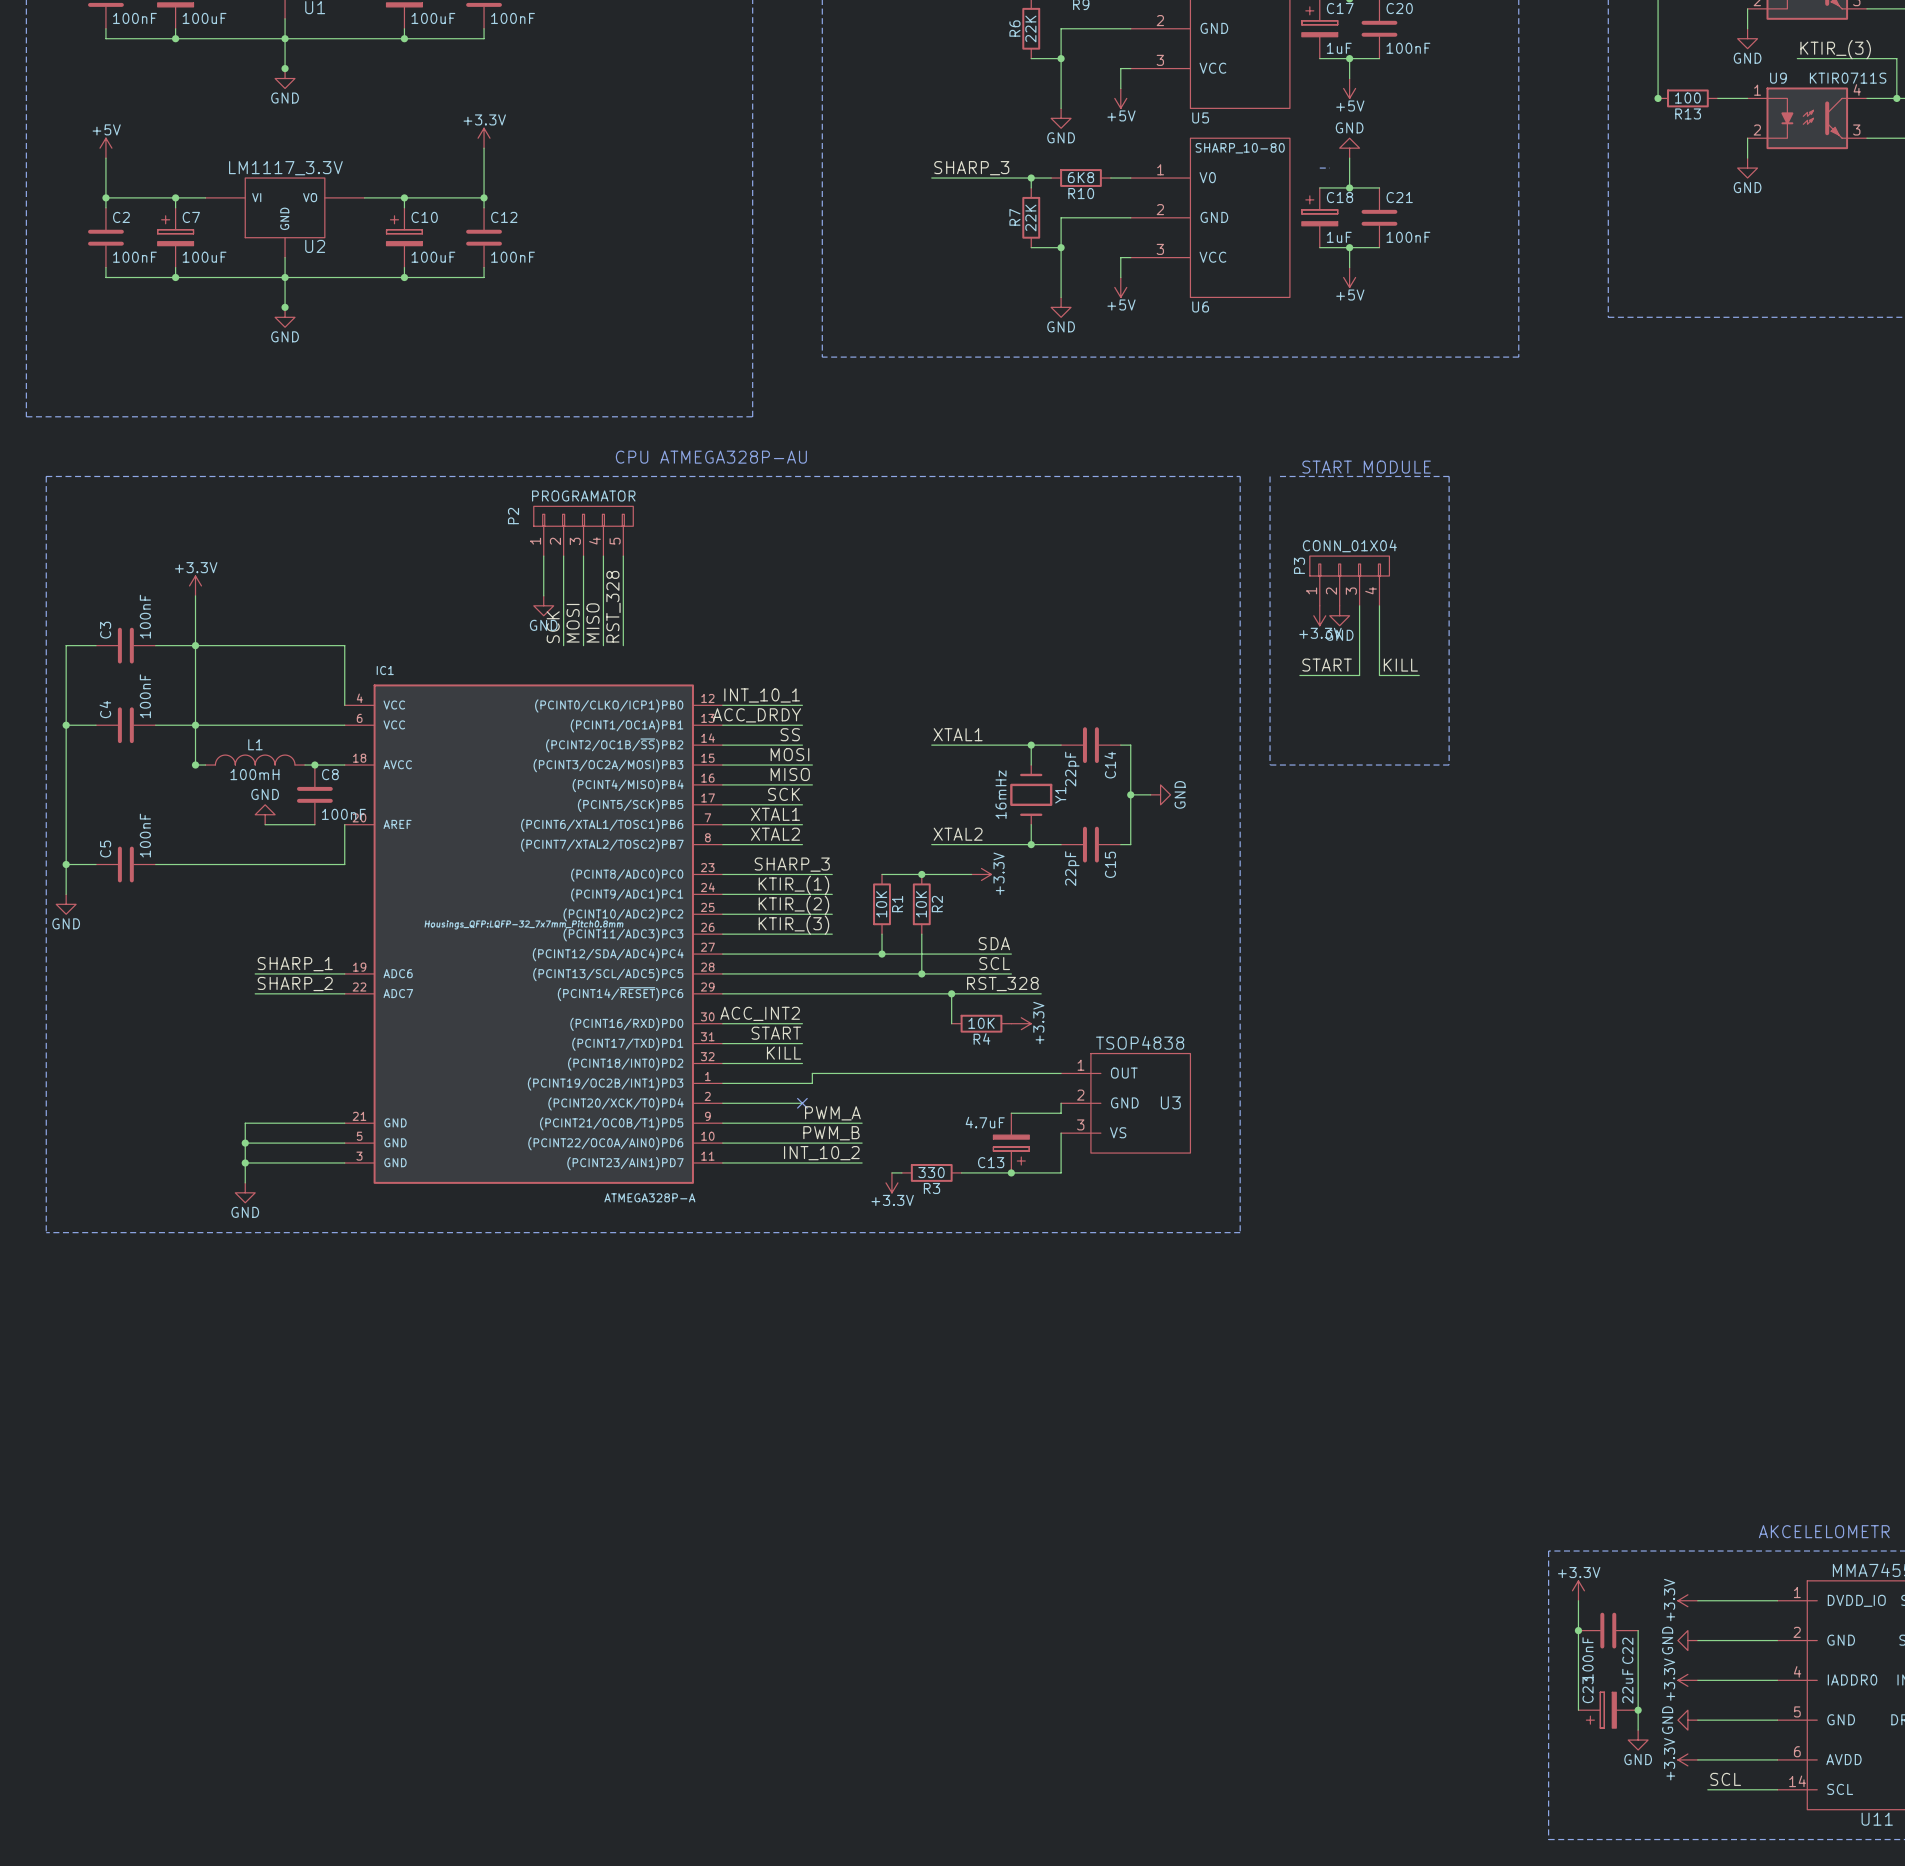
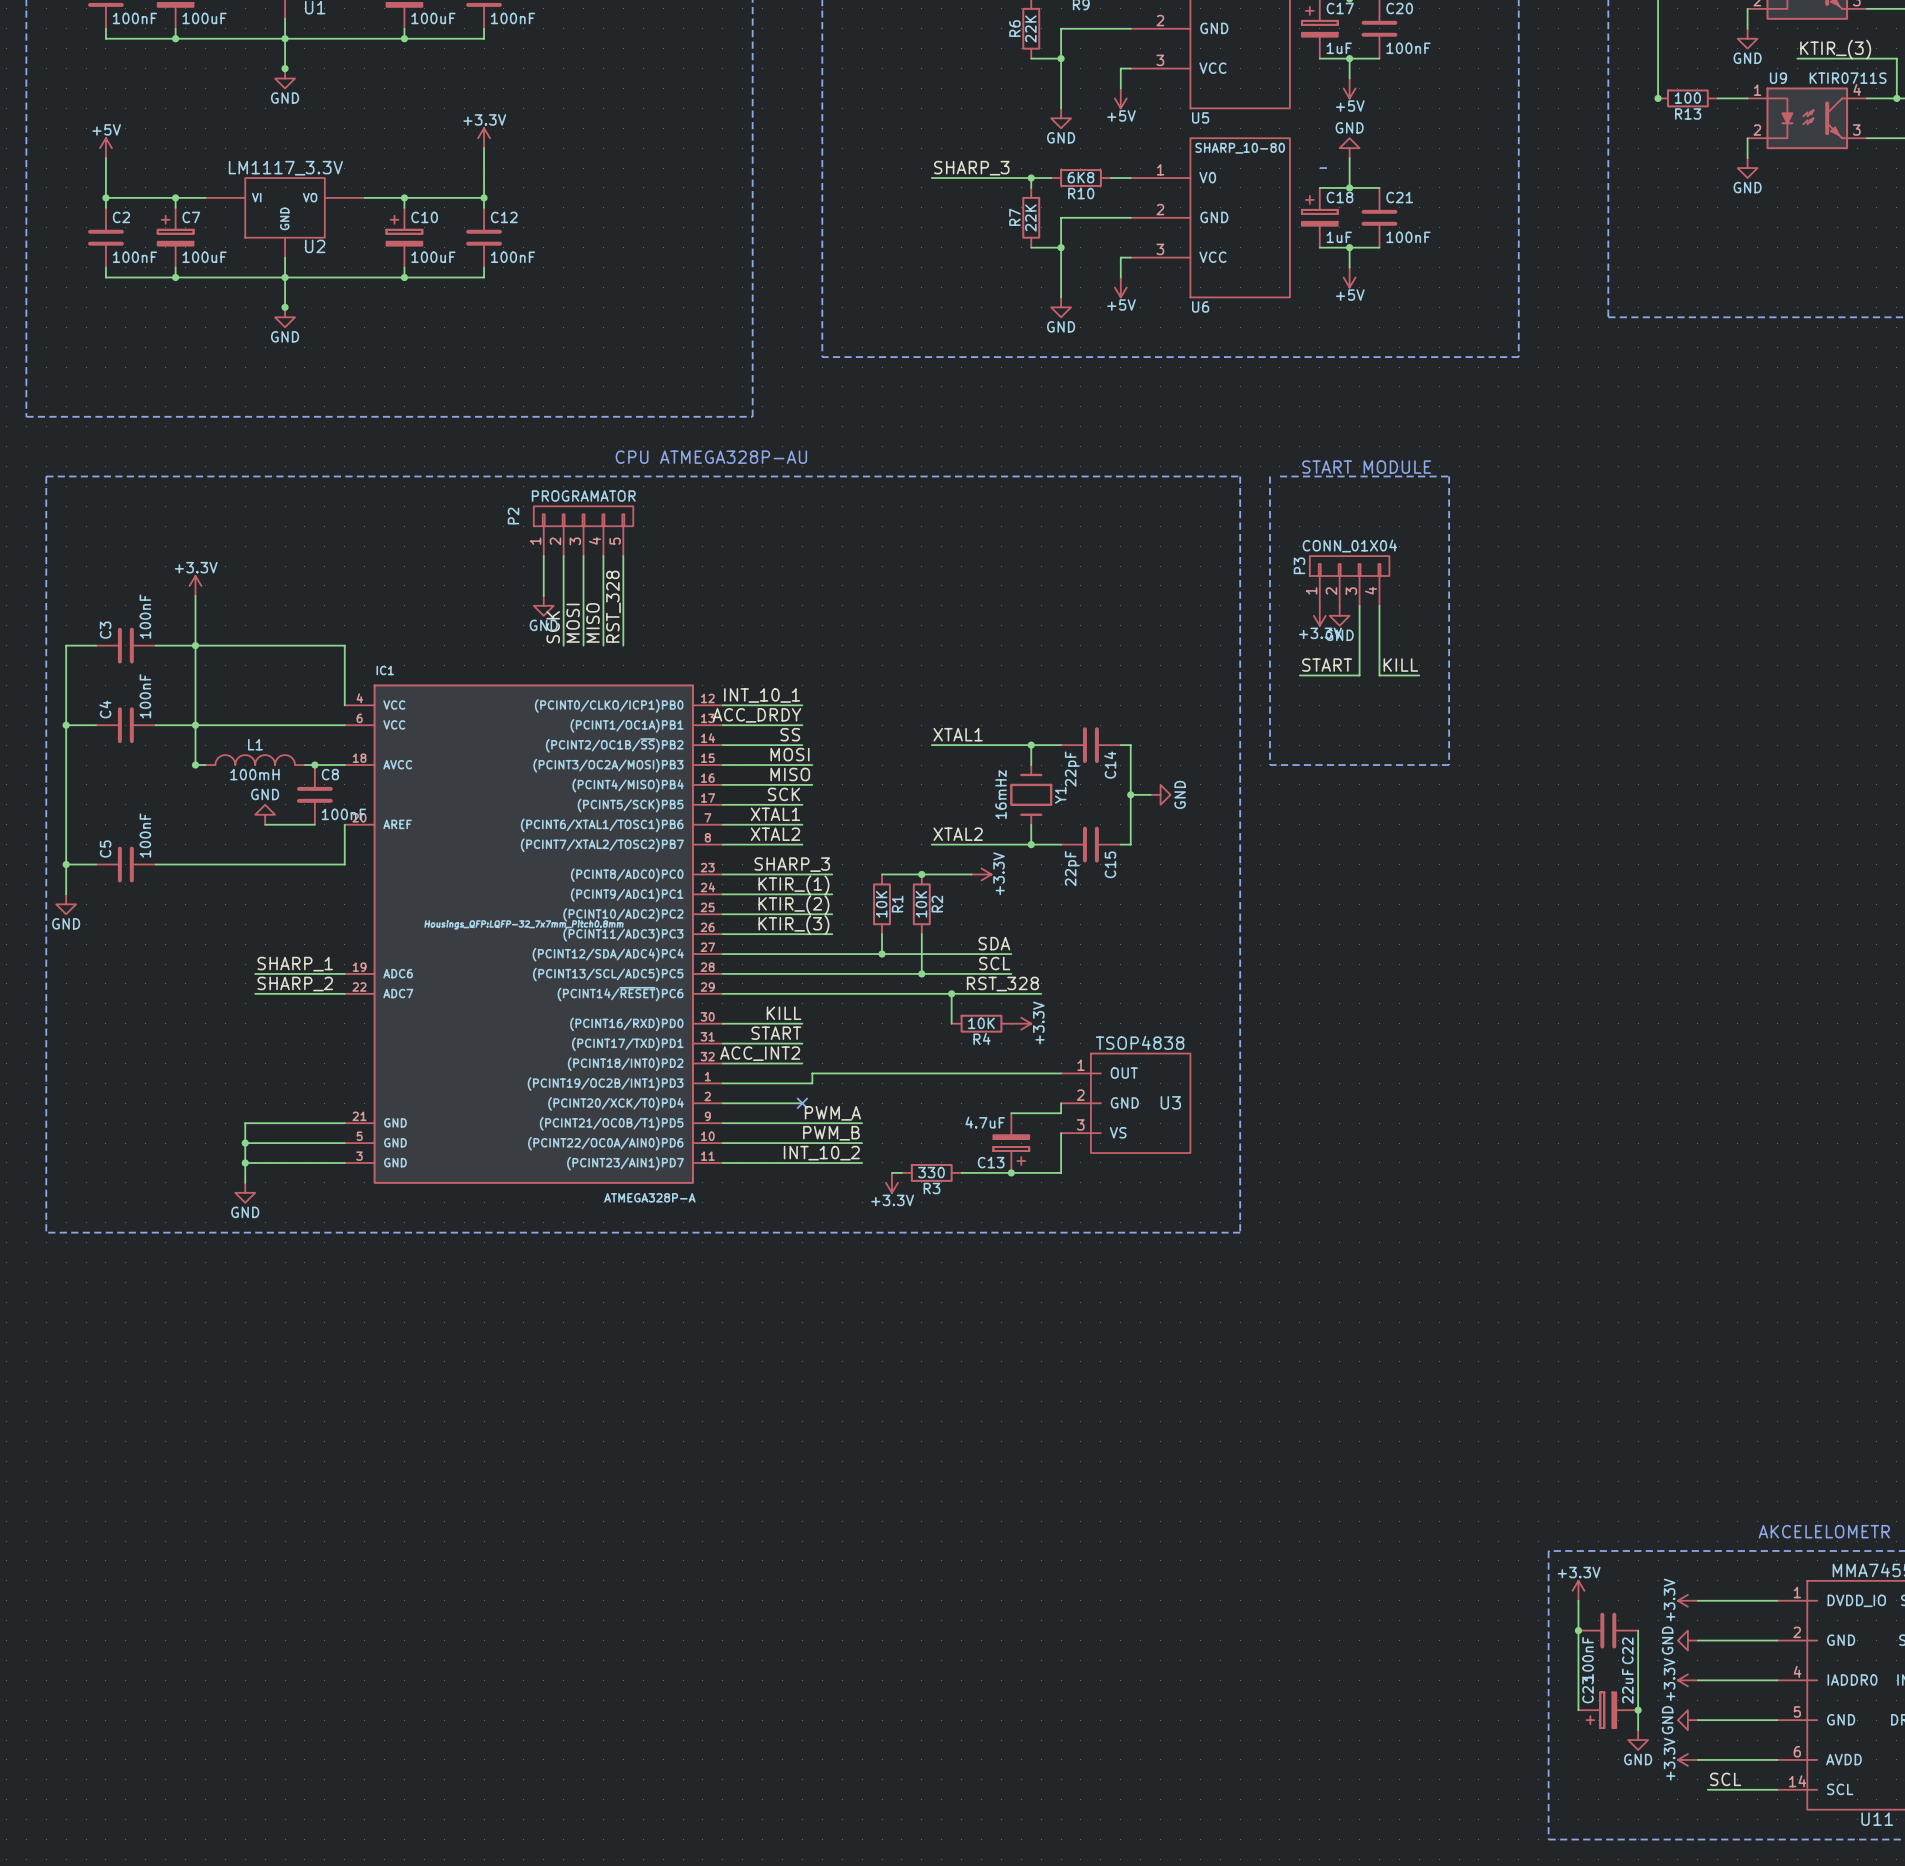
label: ACC_INT2 (760, 1013) -> KILL (784, 1013)
label: KILL (784, 1053) -> ACC_INT2 (760, 1053)

